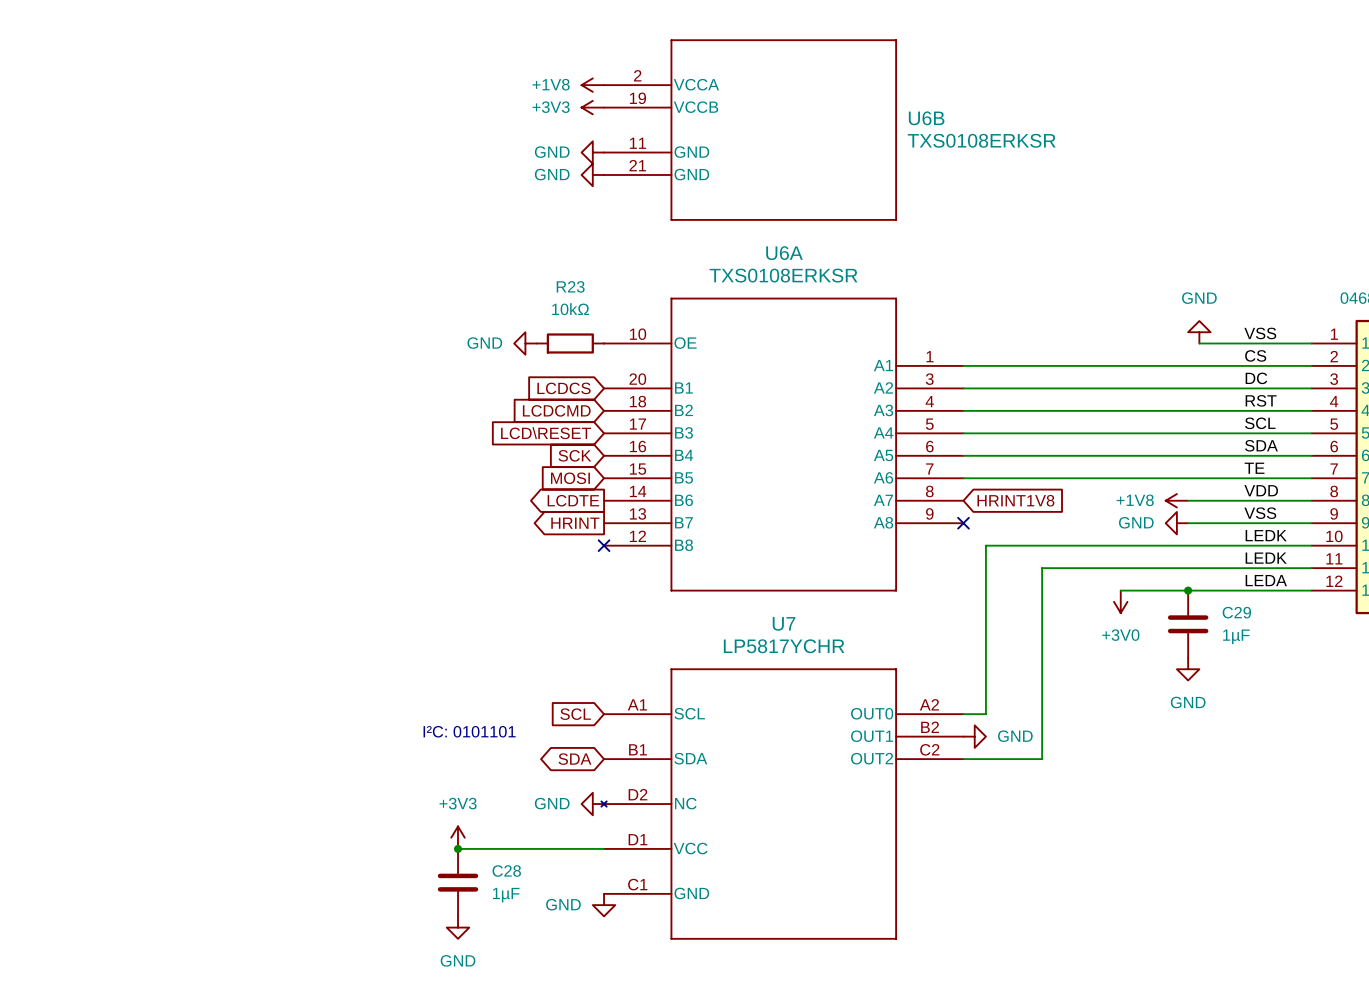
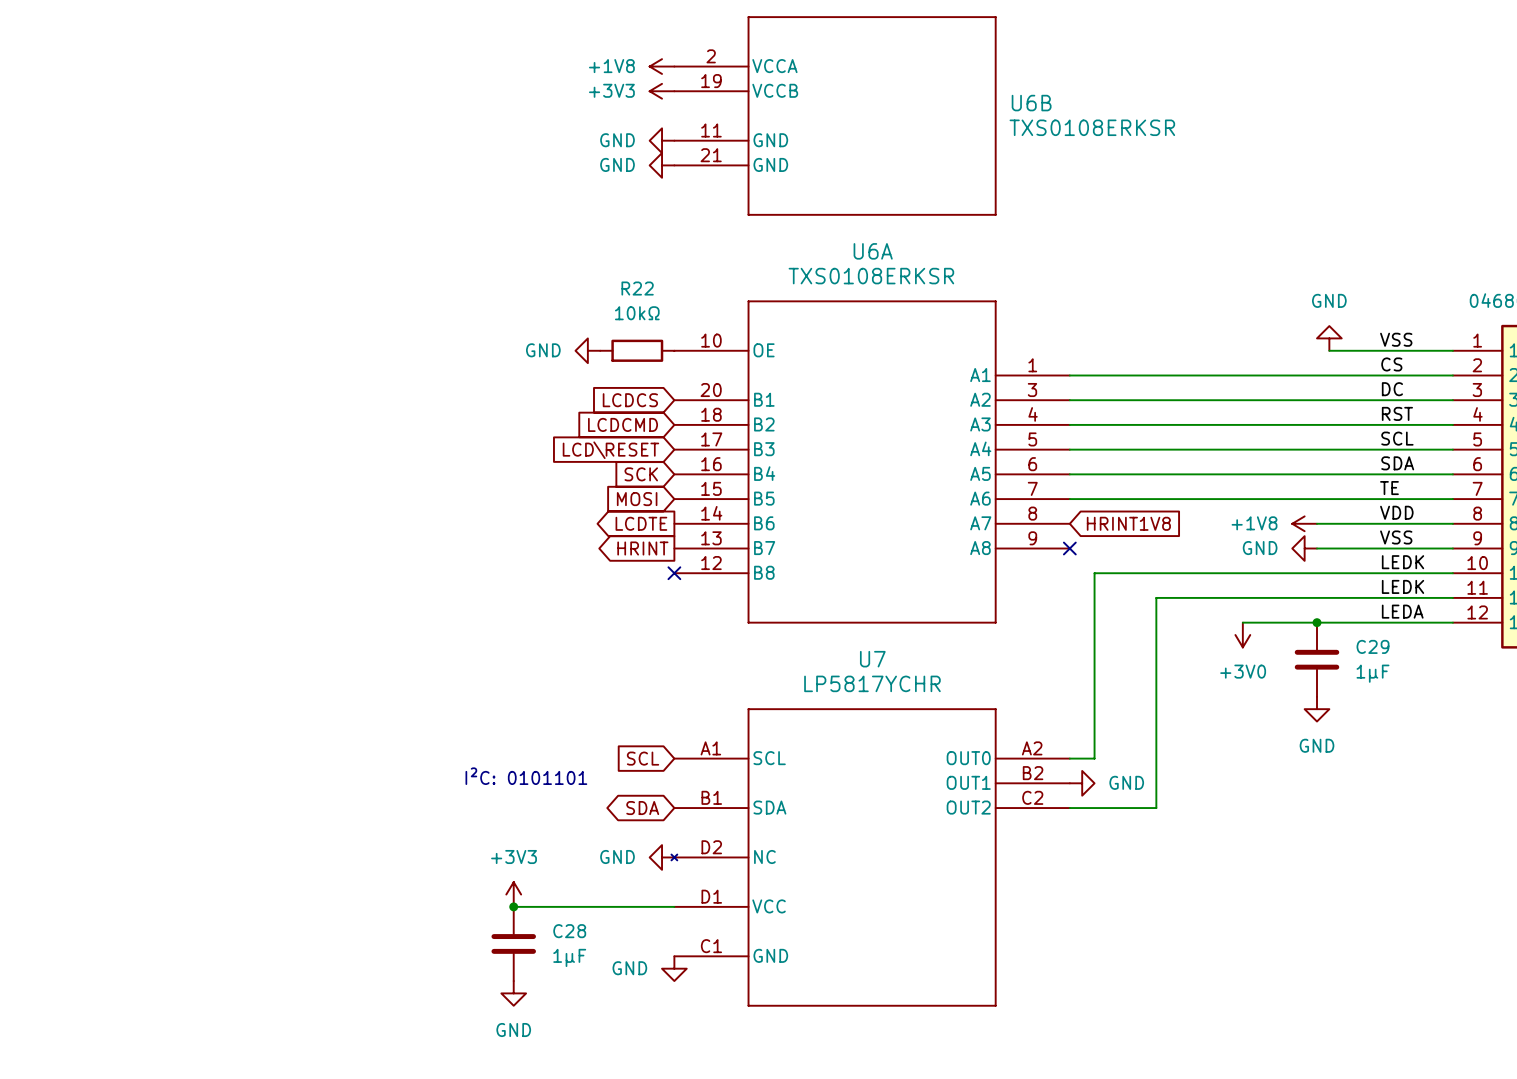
R23 name: R23 (570, 286) -> R22 (637, 288)

